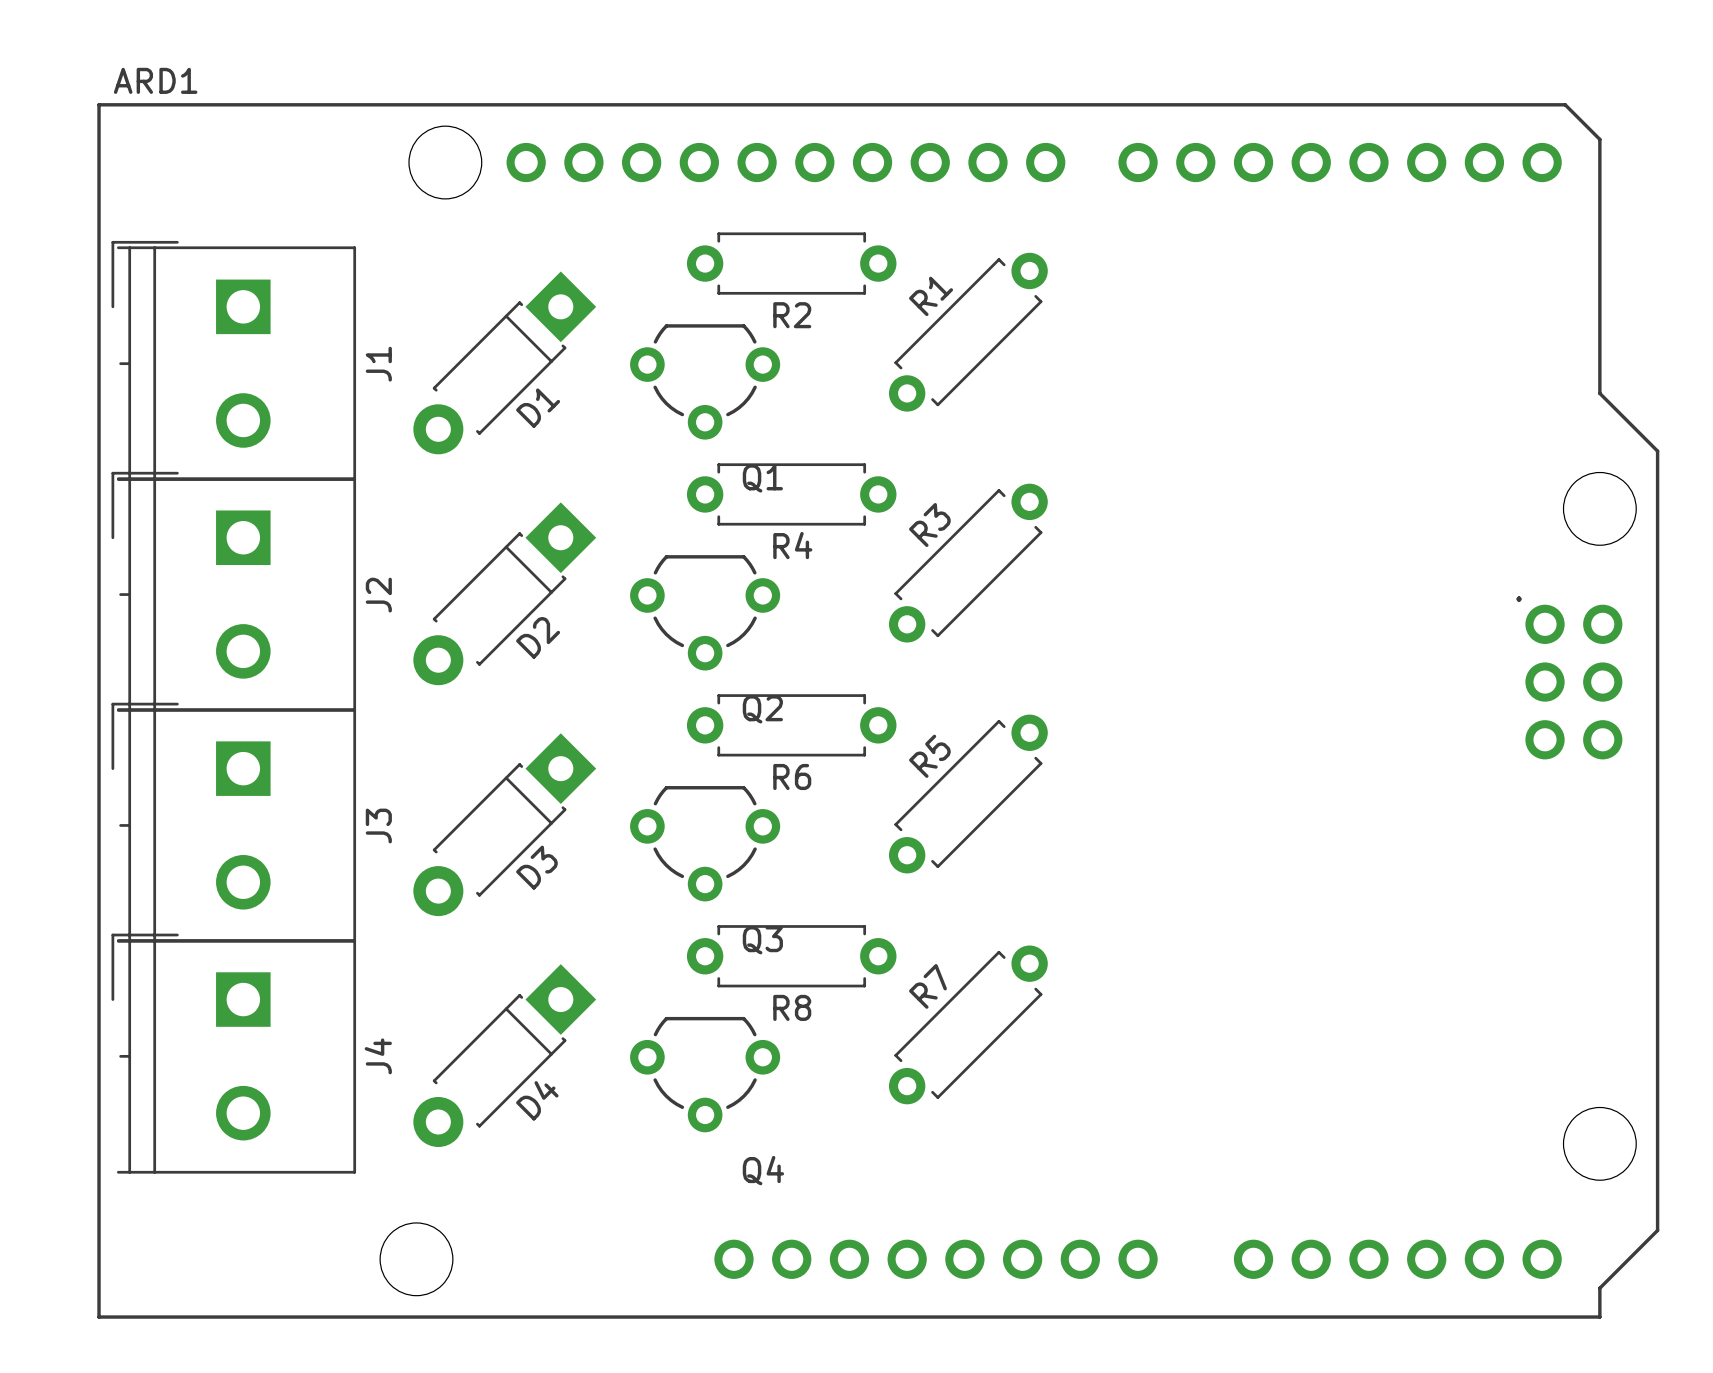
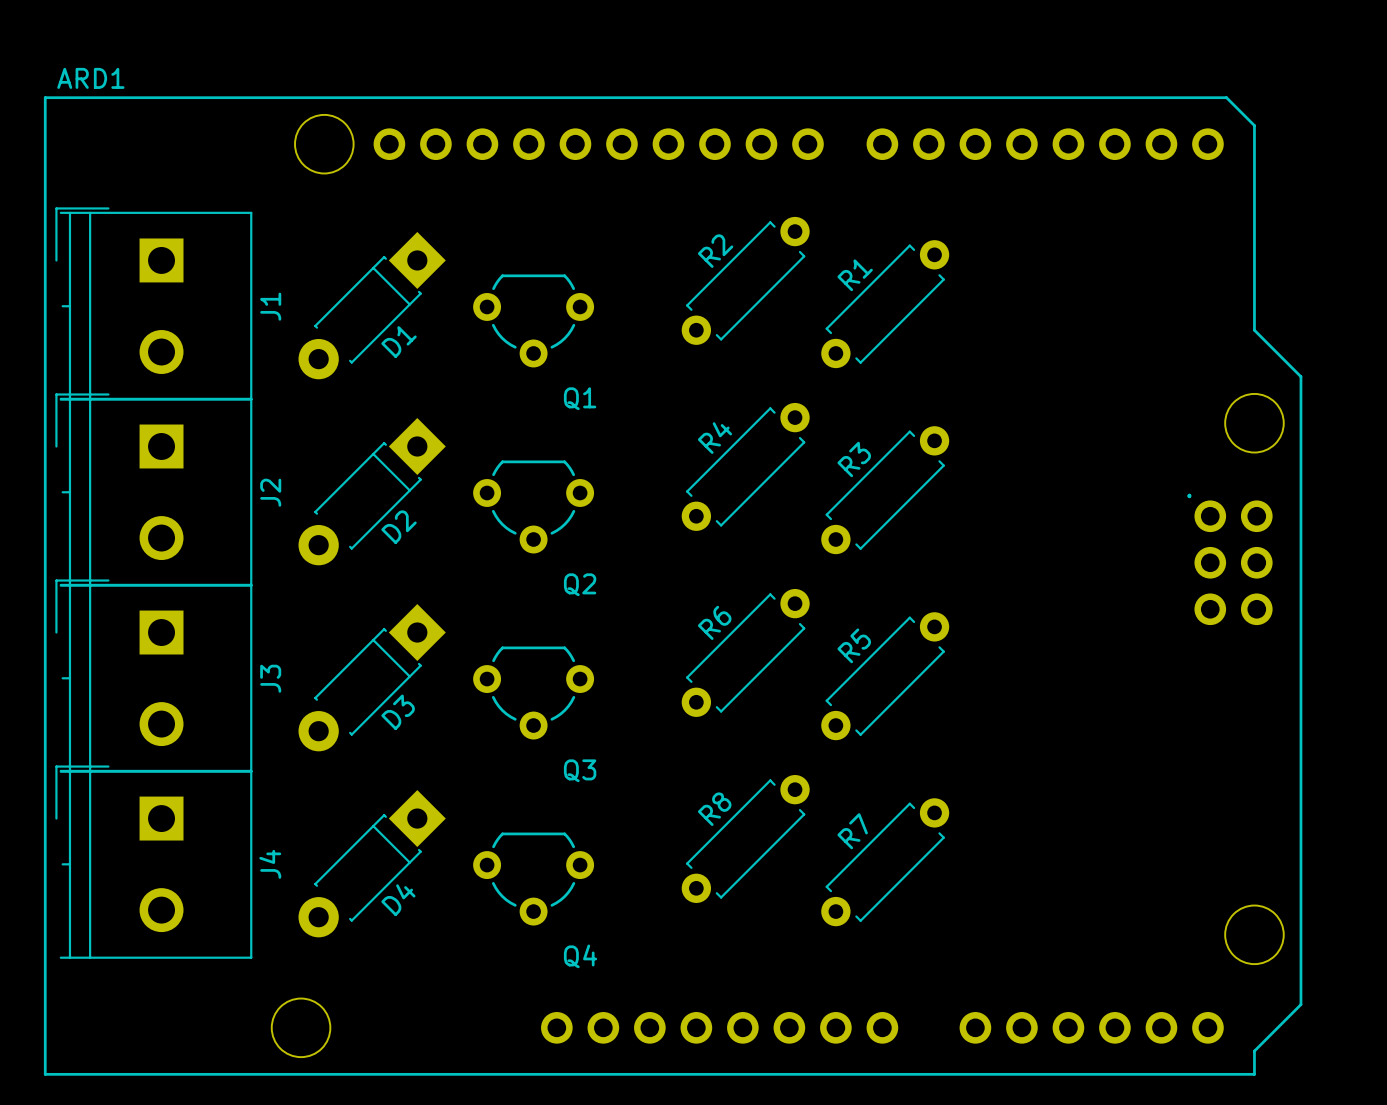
R2: (791, 263) -> none
R1 name: R1 (931, 296) -> R2 (715, 251)
R1: none -> (885, 304)
R4: (791, 494) -> none
R3 name: R3 (929, 525) -> R4 (714, 438)
R3: none -> (885, 490)
R6: (791, 725) -> none
R5 name: R5 (929, 756) -> R6 (714, 622)
R5: none -> (885, 676)
R8: (791, 956) -> none
R7 name: R7 (927, 986) -> R8 (714, 809)
R7: none -> (885, 862)

